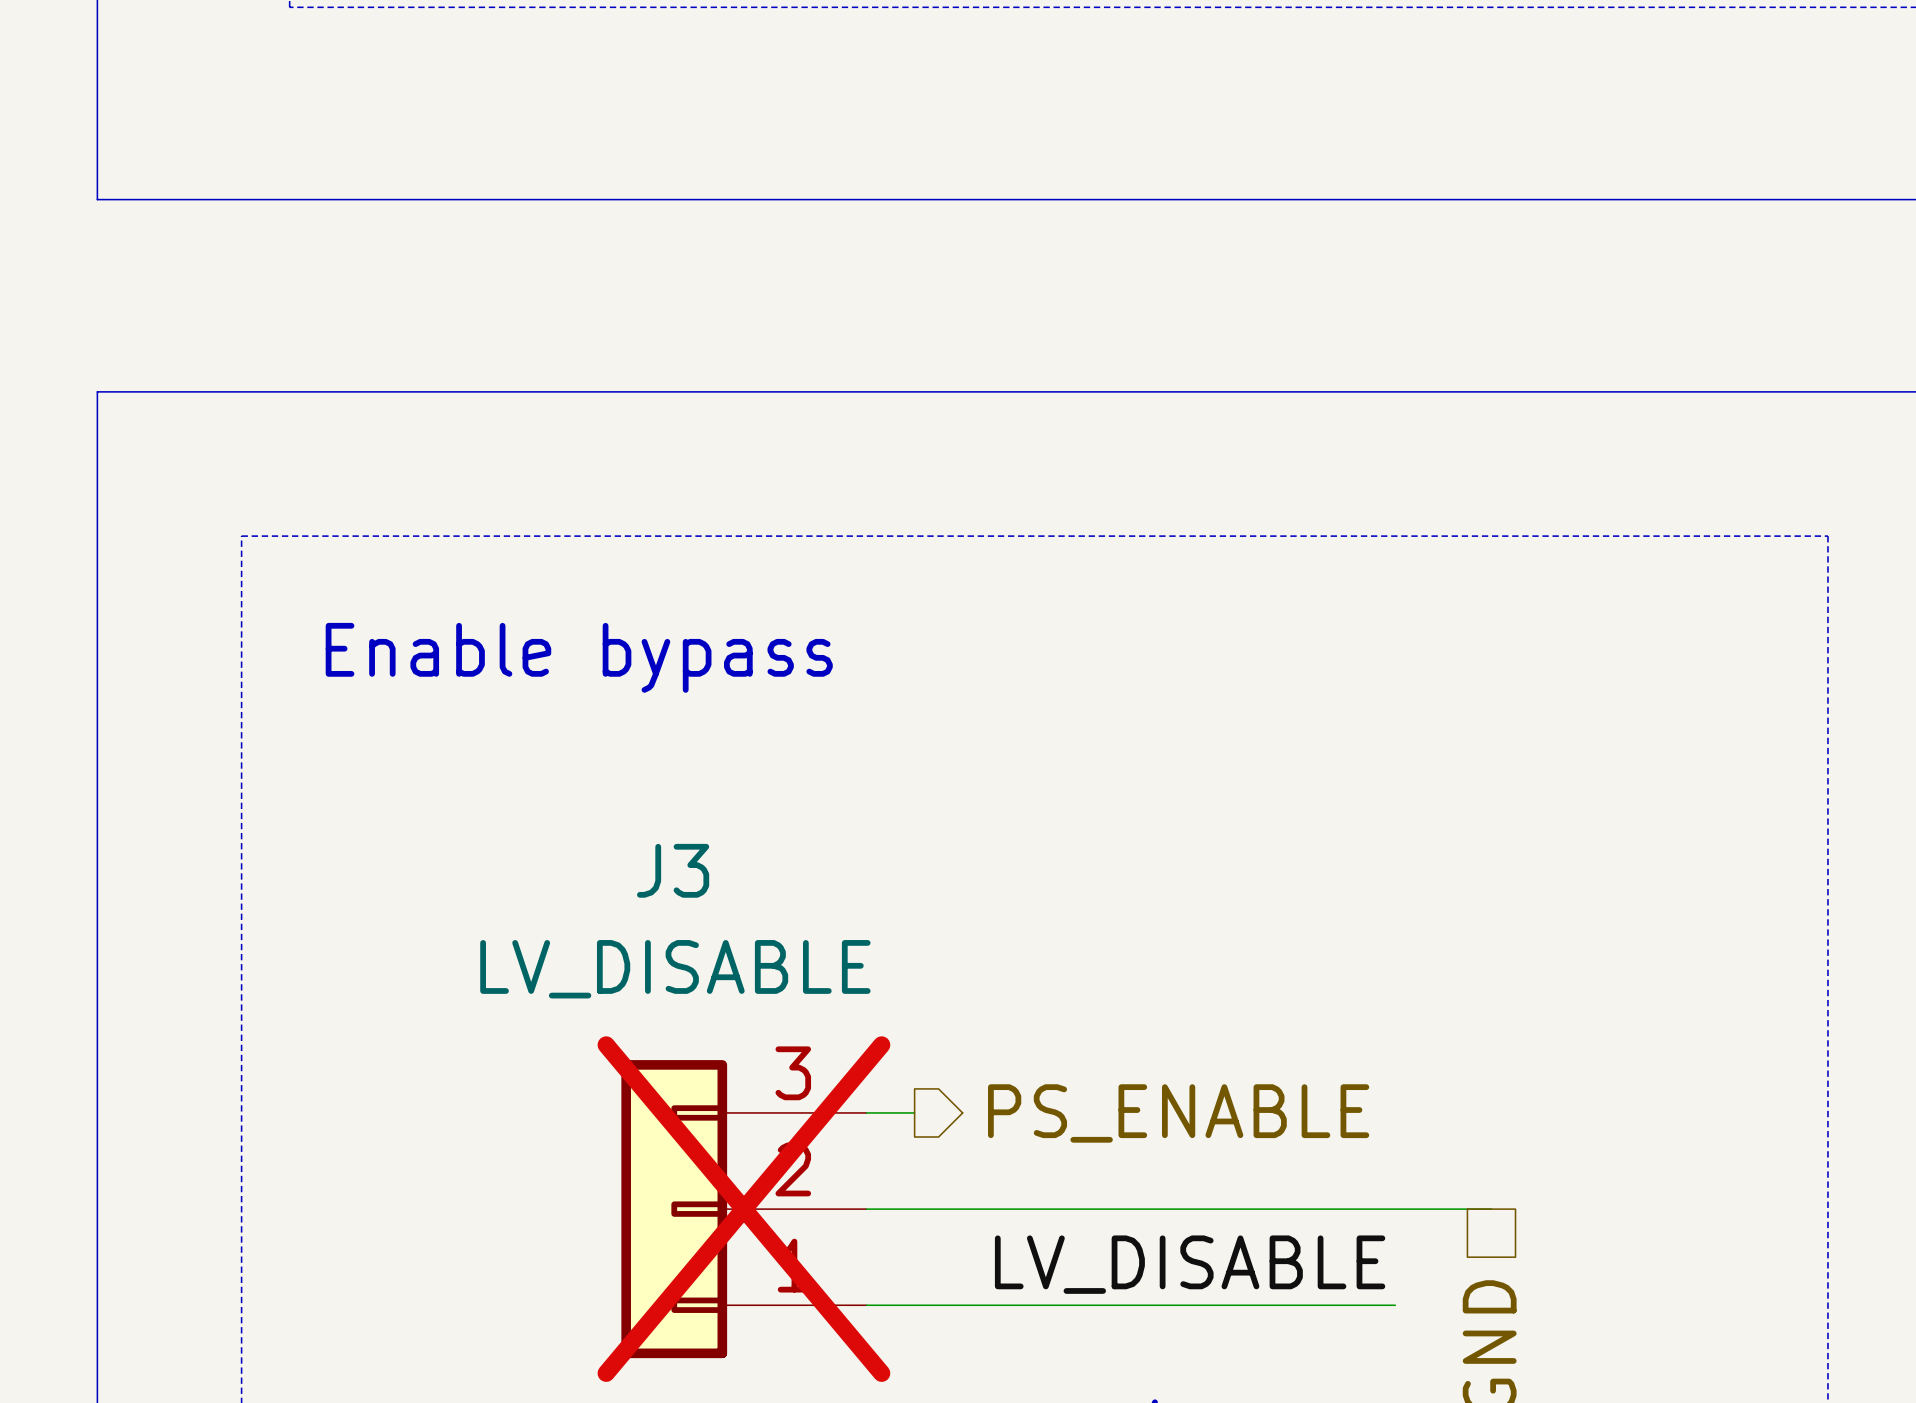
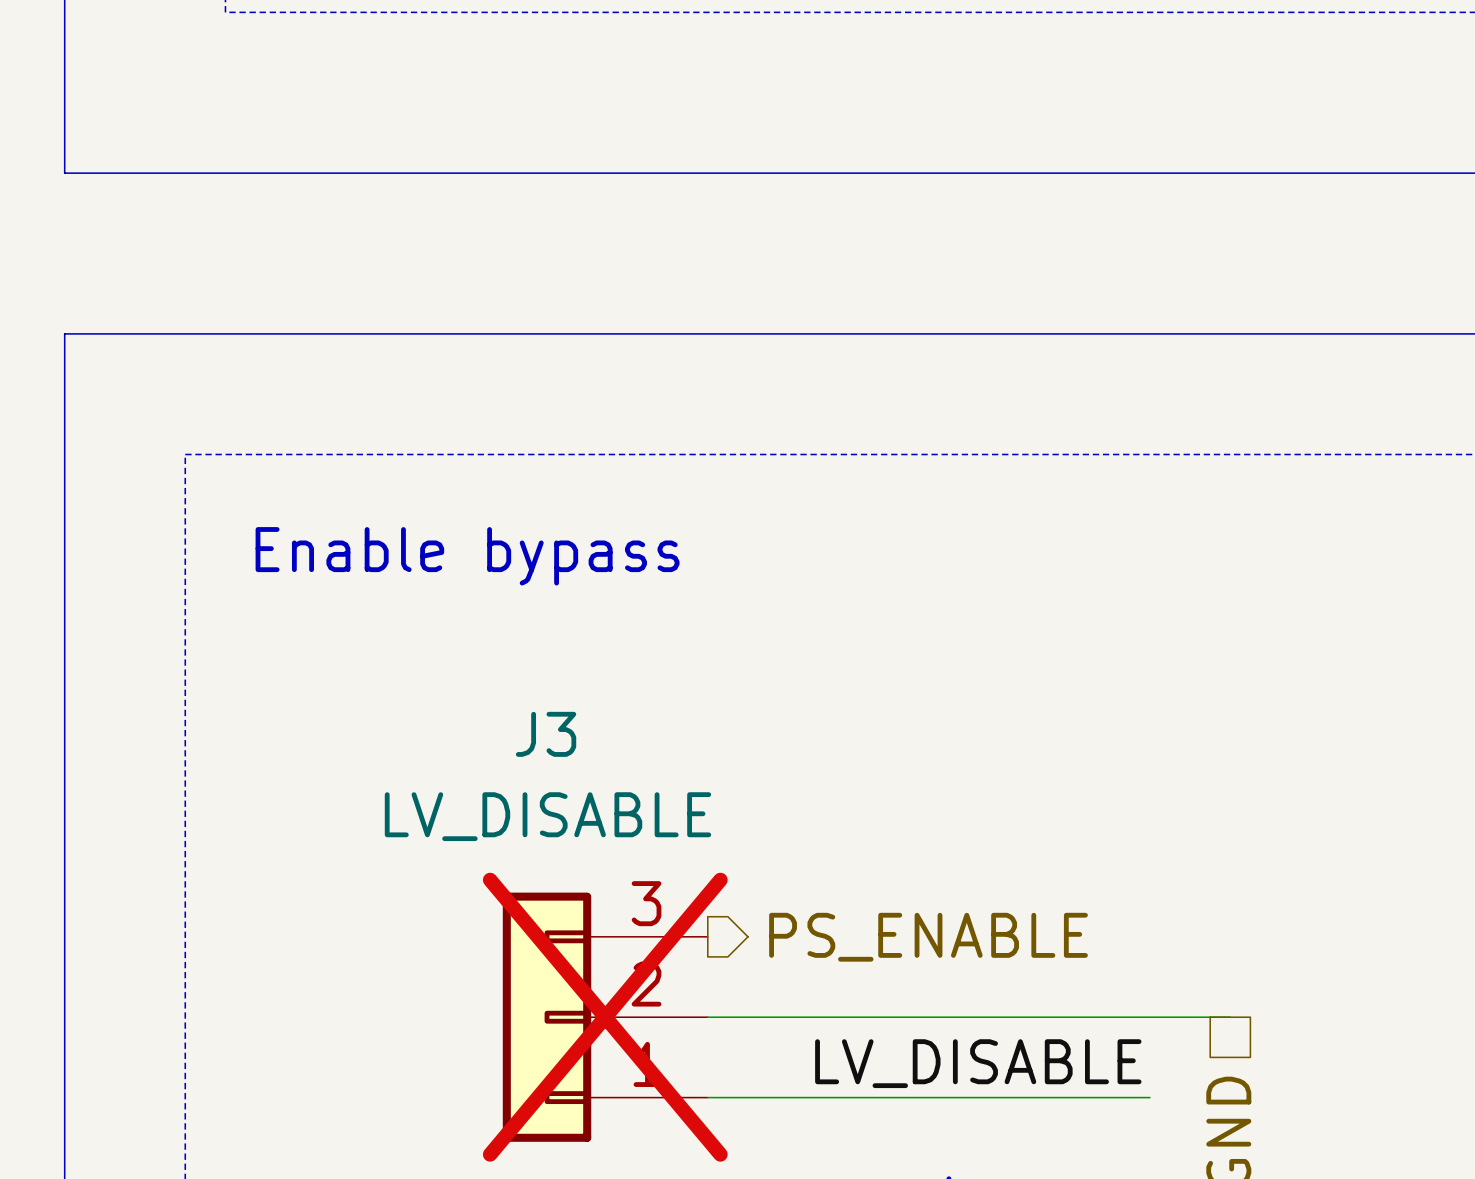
wire: (866, 1112) (914, 1112) -> none
hierarchical label position: PS_ENABLE (1178, 1113) -> PS_ENABLE (928, 937)

